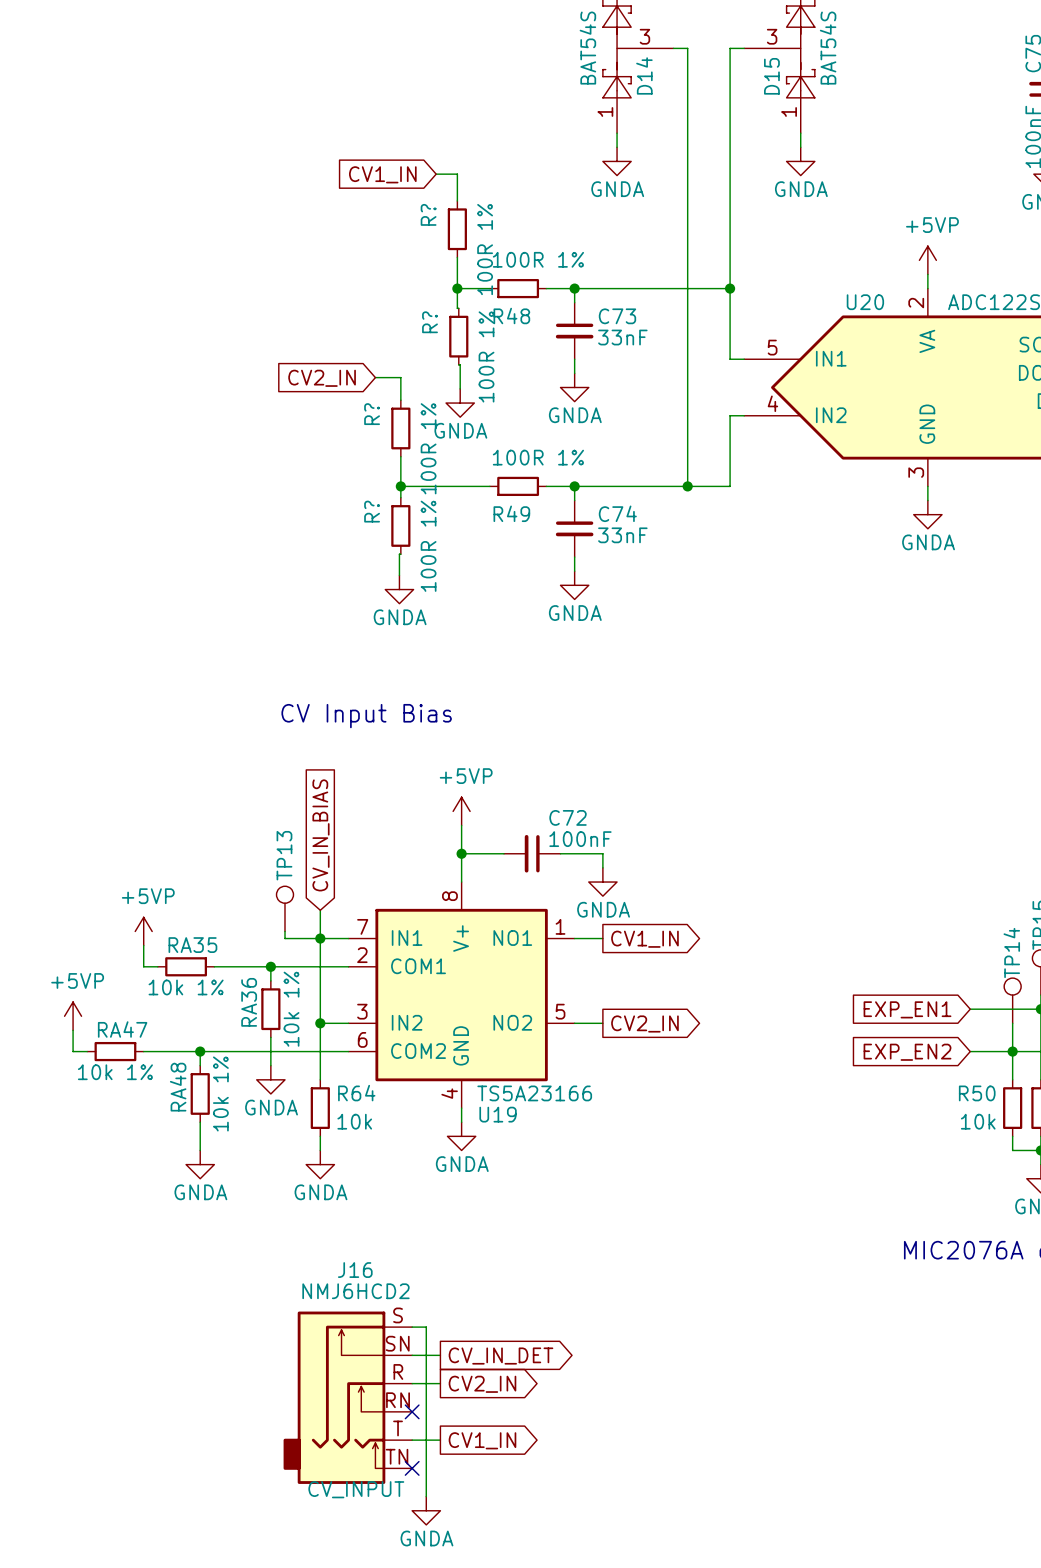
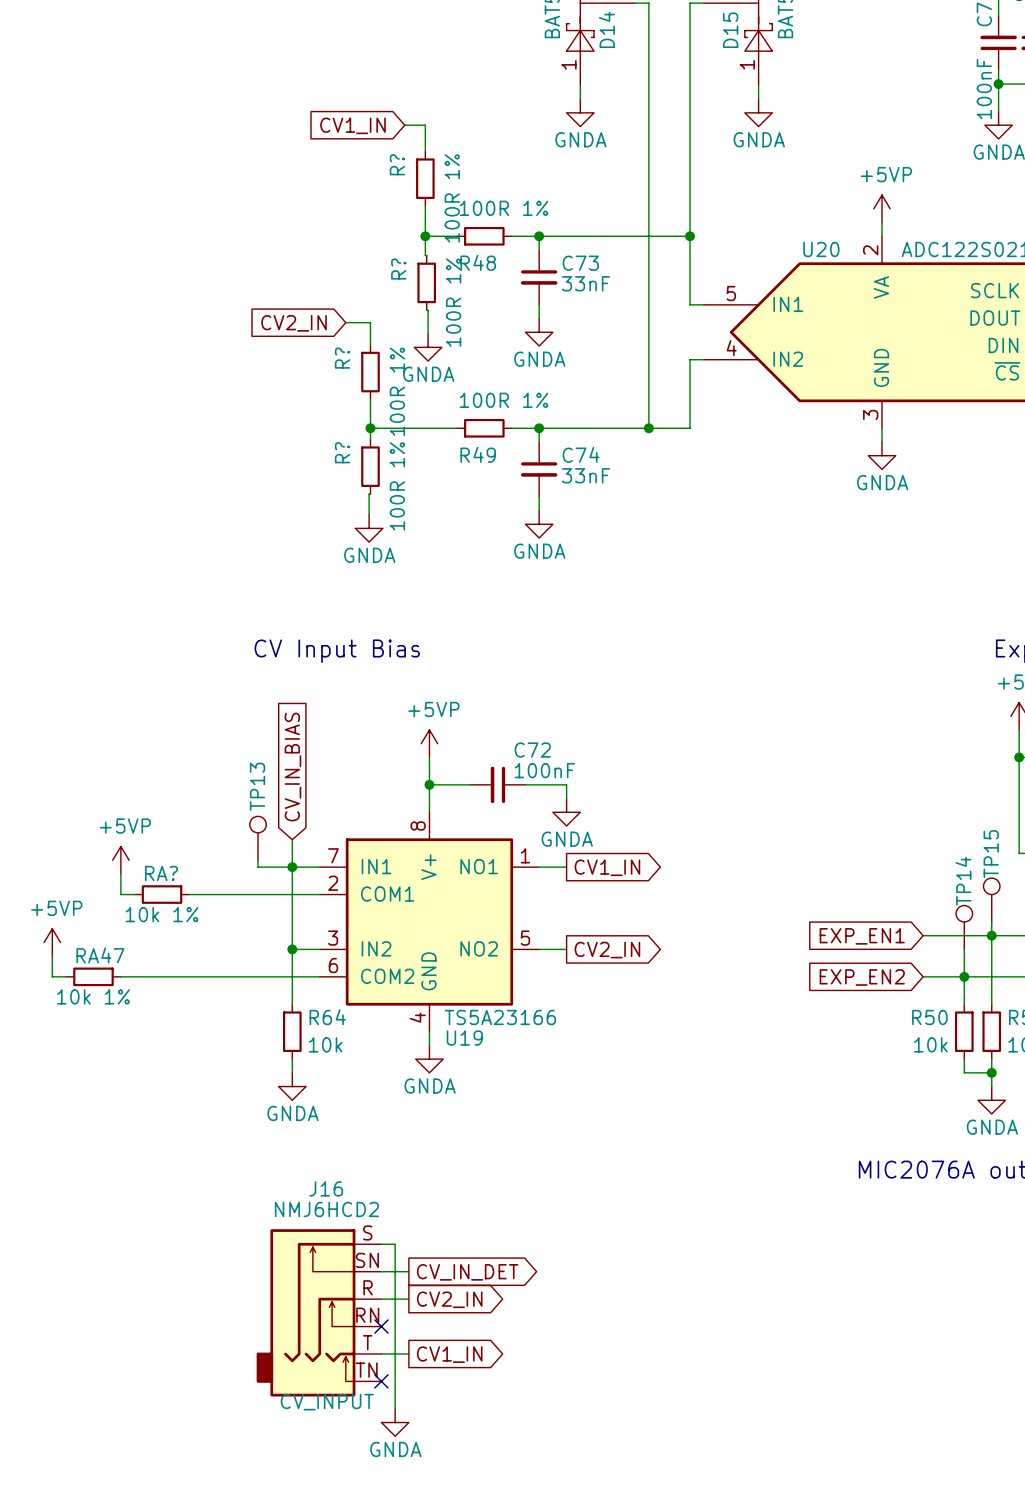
RA35 name: RA35 (192, 945) -> RA? (161, 873)
wire: (270, 966) (270, 980) -> none
junction: (270, 966) -> none
RA36: 10k 1% (270, 1009) -> none
wire: (270, 1037) (270, 1065) -> none
wire: (200, 1051) (200, 1065) -> none
junction: (200, 1051) -> none
power symbol: GNDA (270, 1079) -> none
RA48: 10k 1% (200, 1093) -> none
wire: (200, 1122) (200, 1150) -> none
power symbol: GNDA (200, 1164) -> none

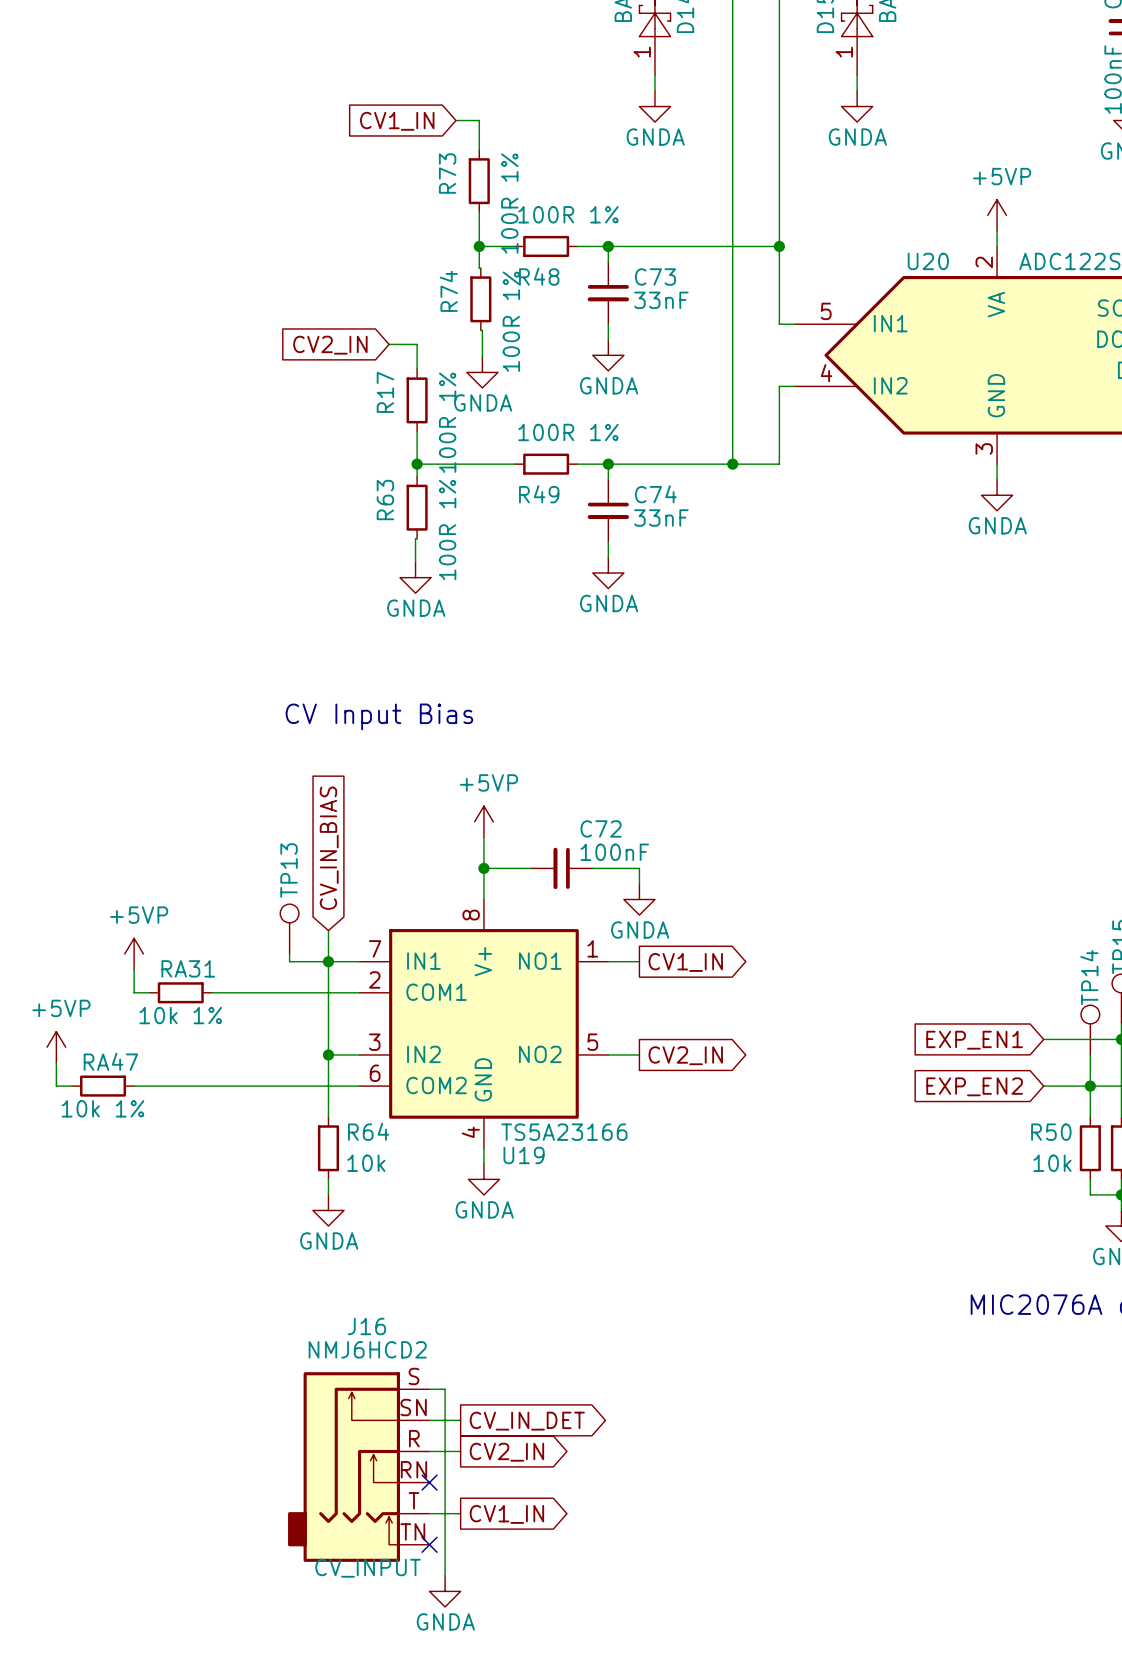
R? name: R? (397, 164) -> R73 (447, 173)
R? name: R? (398, 268) -> R74 (448, 291)
R? name: R? (342, 358) -> R17 (385, 392)
R? name: R? (342, 452) -> R63 (385, 500)
RA? name: RA? (161, 873) -> RA31 (188, 968)

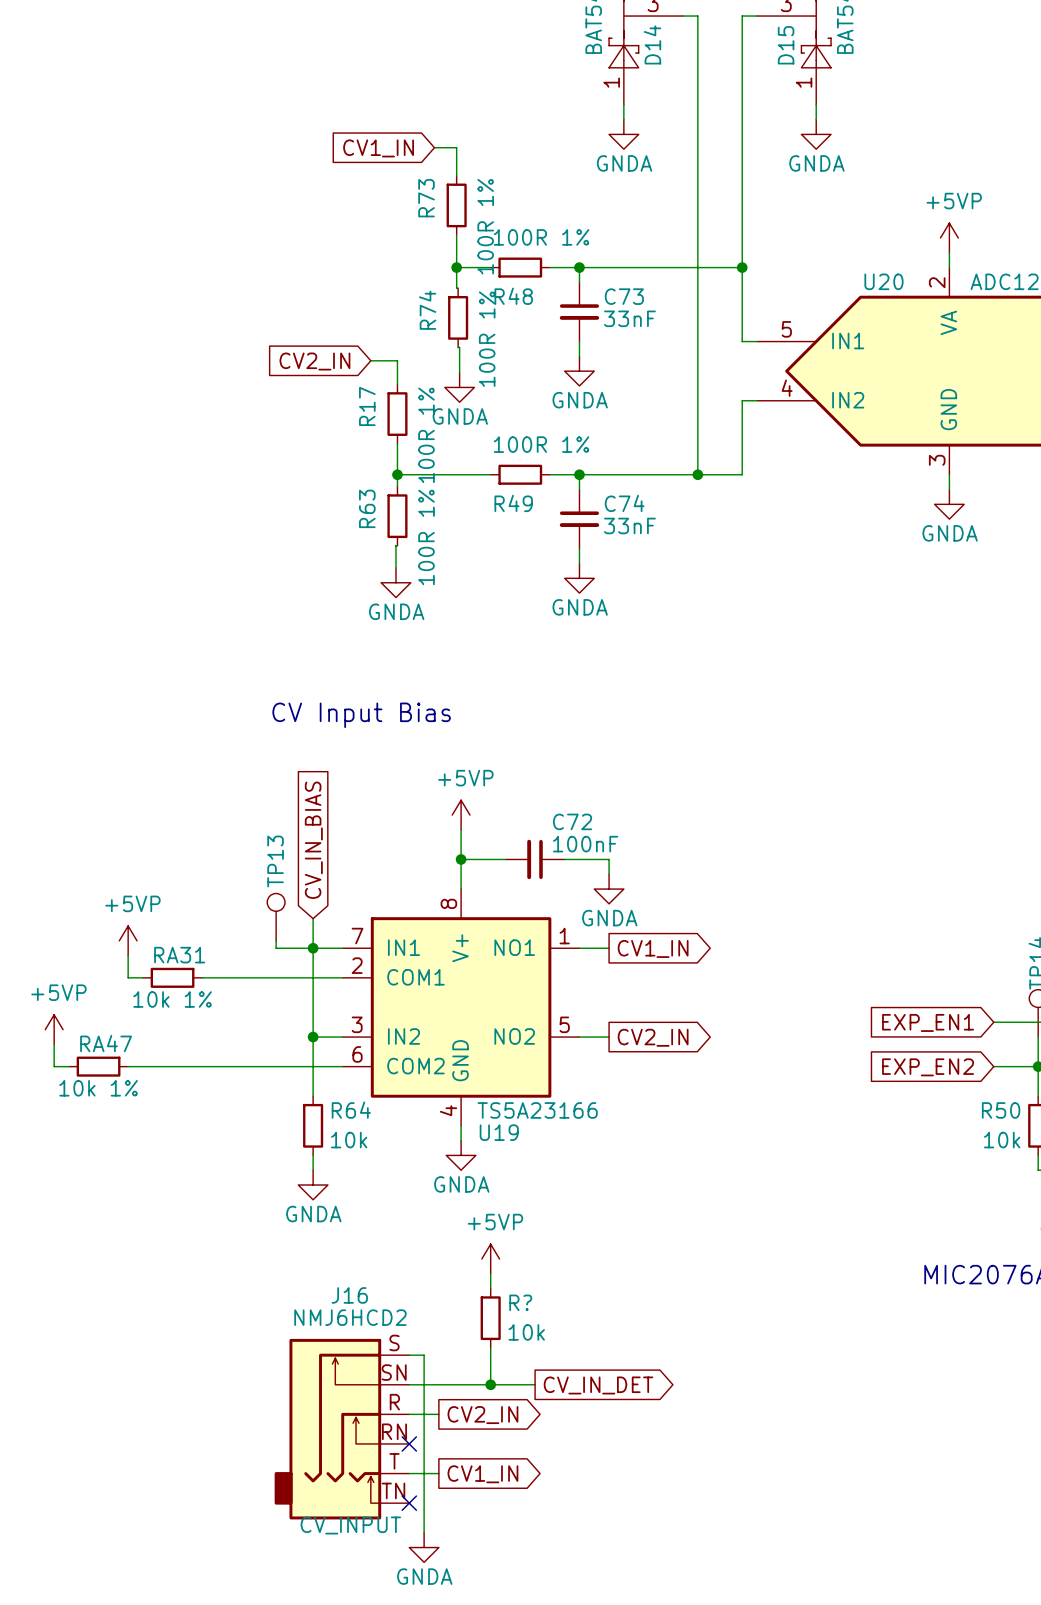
power symbol: none -> +5VP (490, 1259)
wire: none -> (490, 1273) (490, 1288)
R?: none -> 10k (490, 1318)
wire: none -> (490, 1347) (490, 1384)
wire: none -> (438, 1384) (535, 1384)
junction: none -> (490, 1384)
global label position: CV_IN_DET (527, 1421) -> CV_IN_DET (598, 1385)

